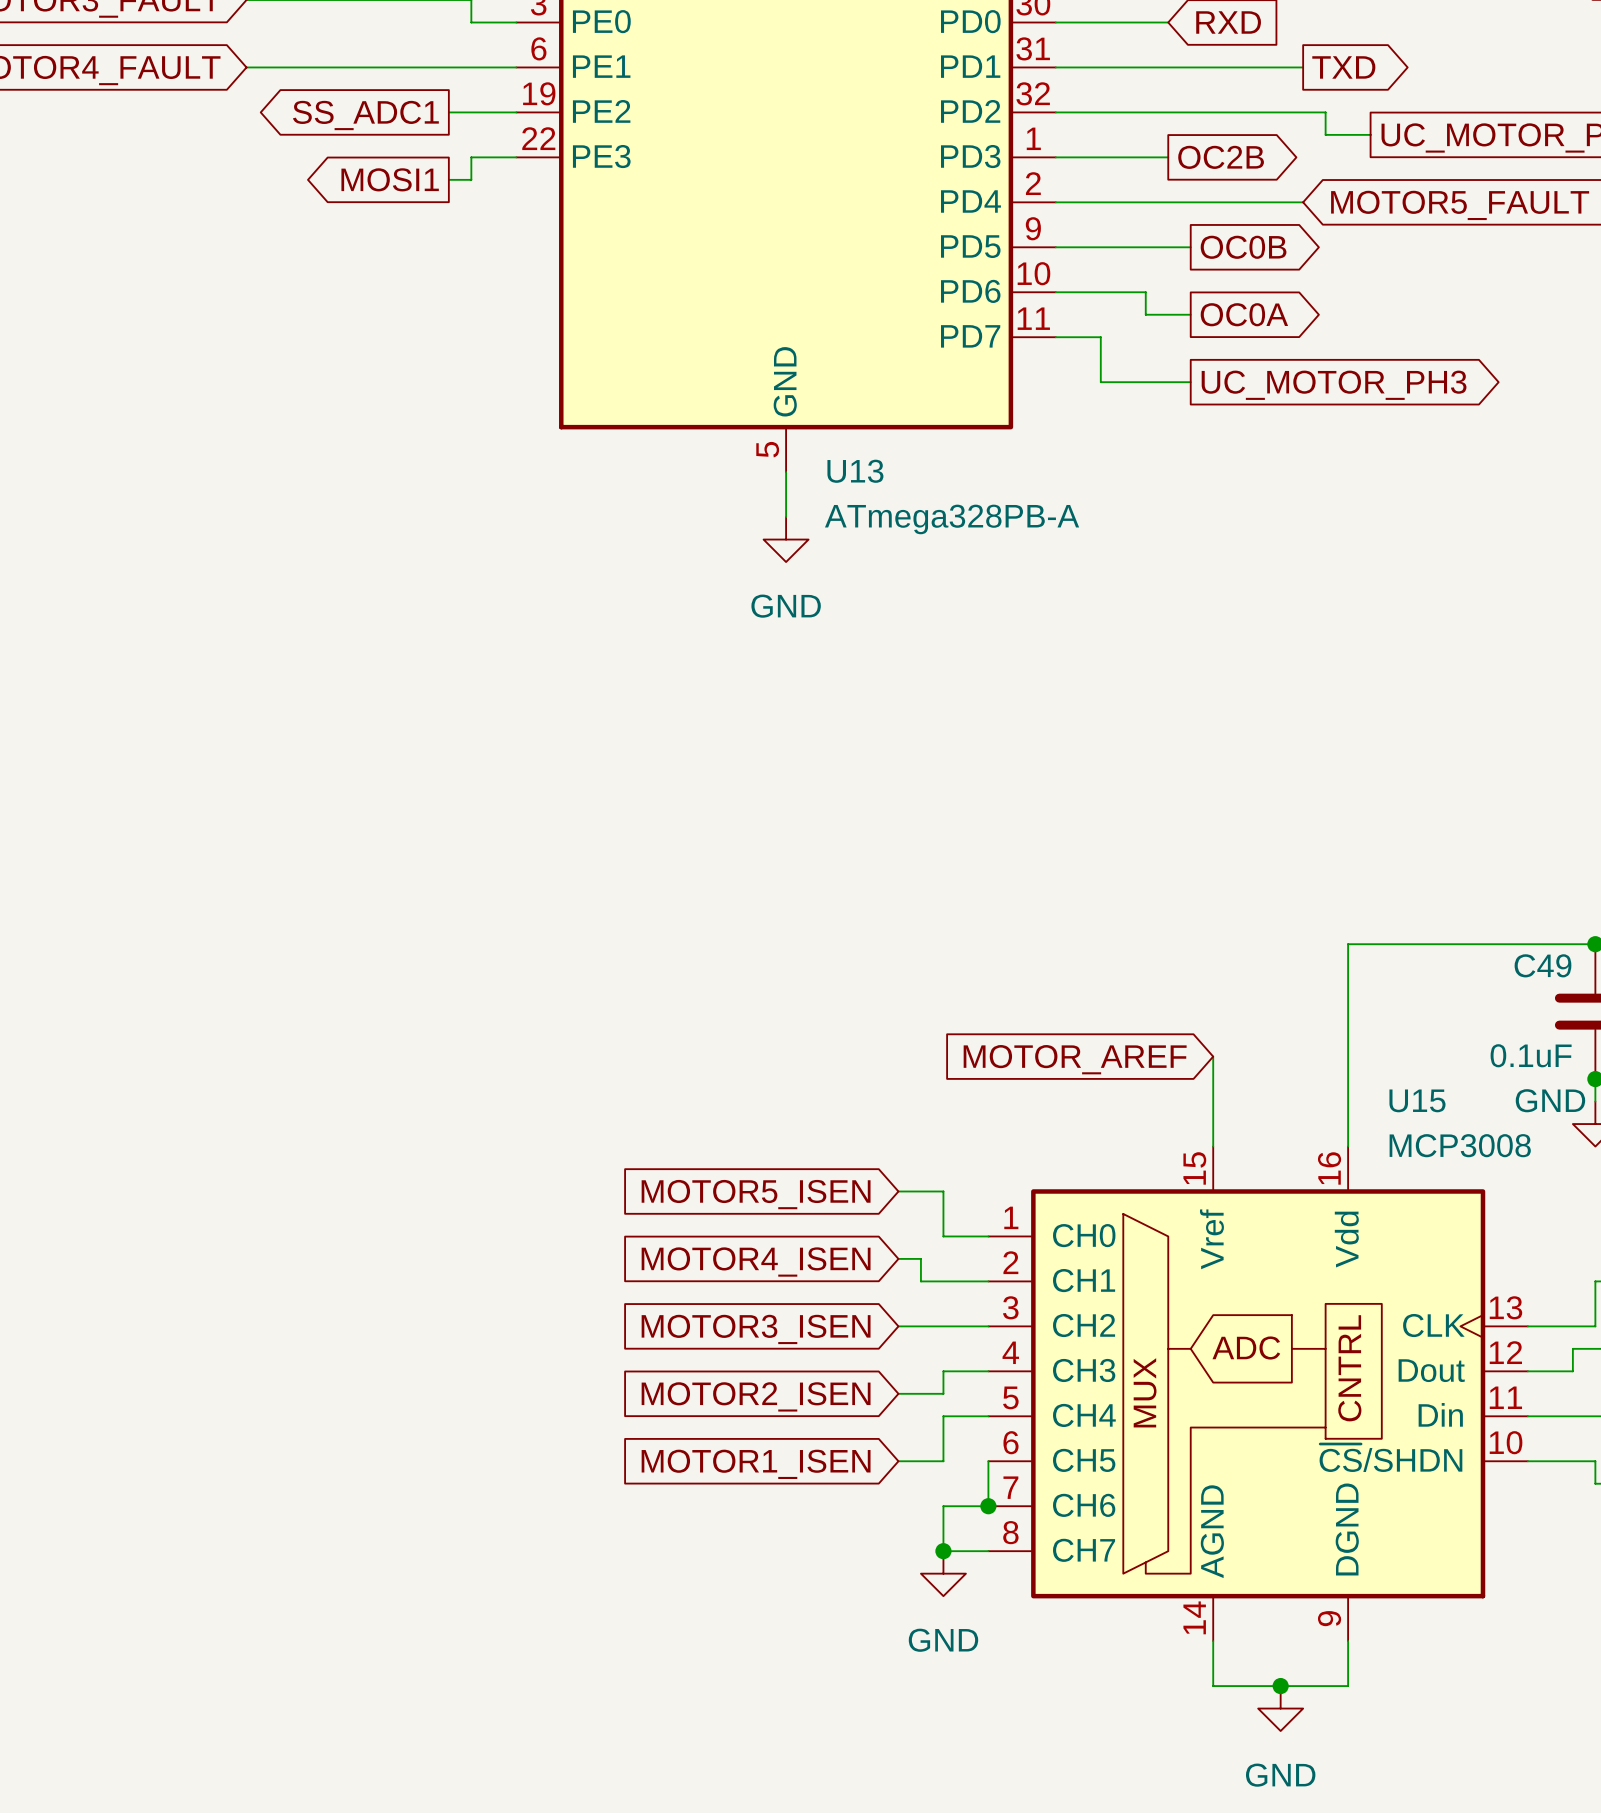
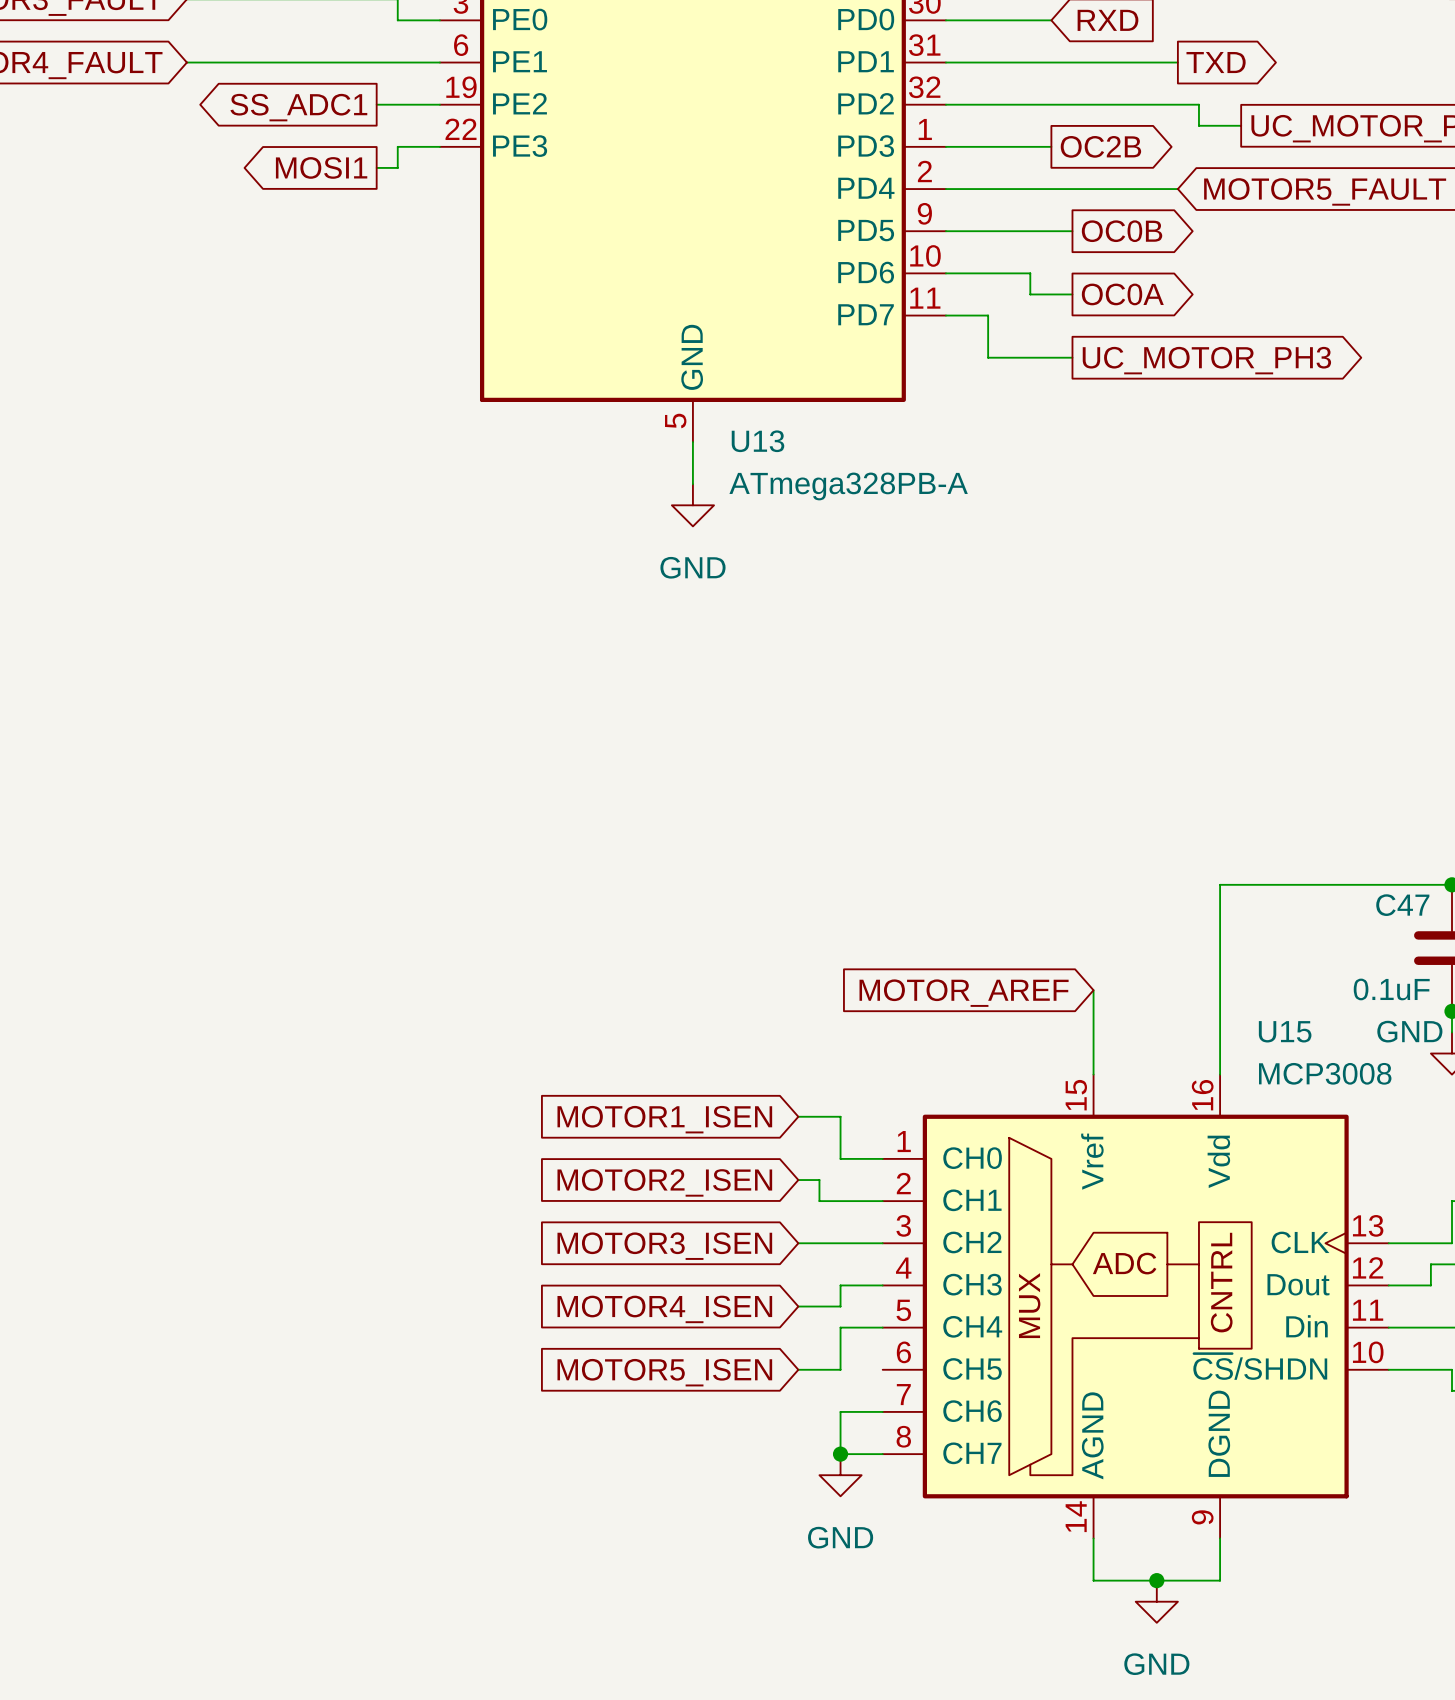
C49 name: C49 (1542, 965) -> C47 (1402, 905)
global label: MOTOR5_ISEN (756, 1194) -> MOTOR1_ISEN (664, 1119)
global label: MOTOR4_ISEN (756, 1262) -> MOTOR2_ISEN (664, 1182)
global label: MOTOR2_ISEN (756, 1396) -> MOTOR4_ISEN (664, 1309)
wire: (988, 1461) (988, 1506) -> none
global label: MOTOR1_ISEN (756, 1464) -> MOTOR5_ISEN (664, 1372)
junction: (988, 1506) -> none

